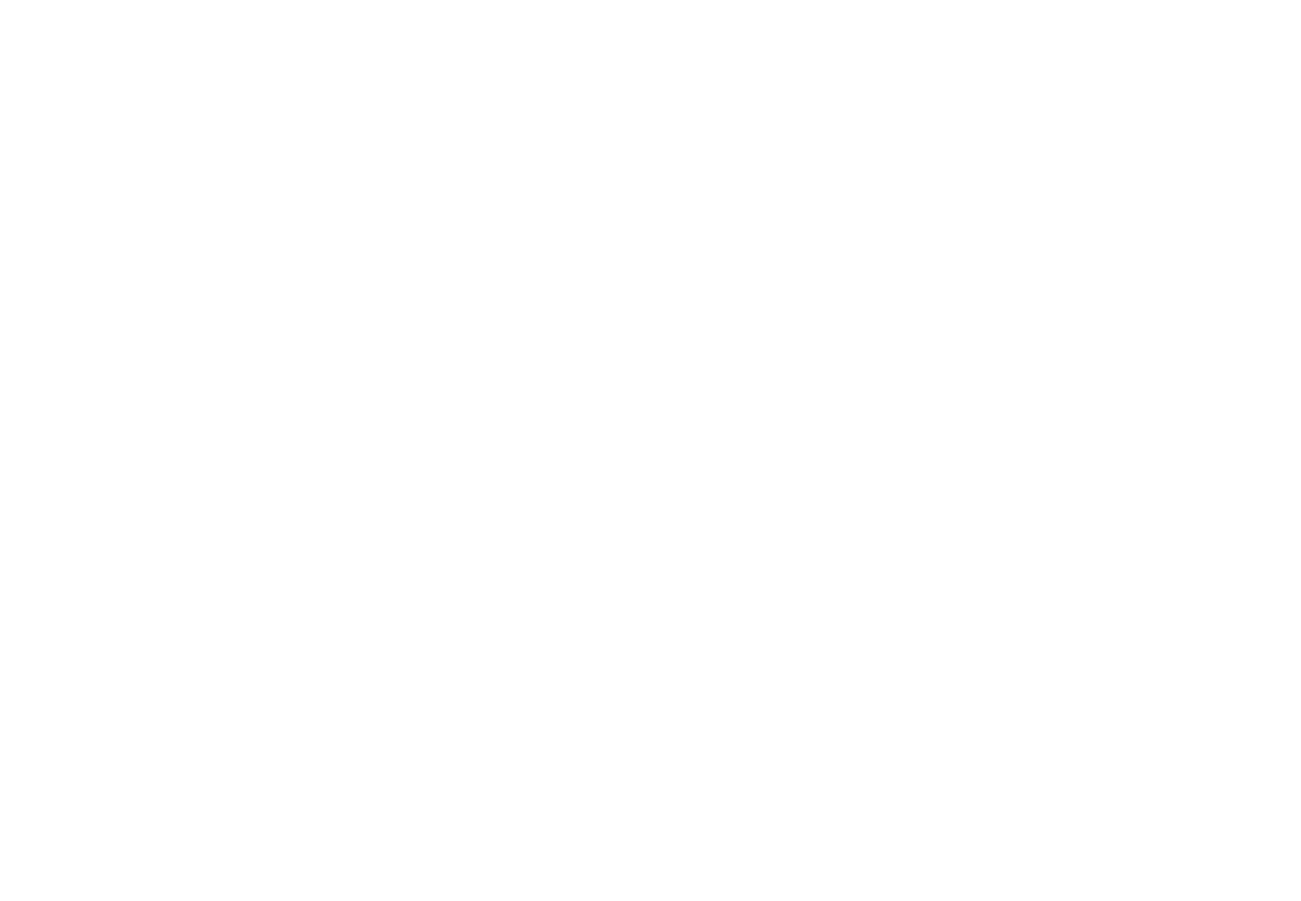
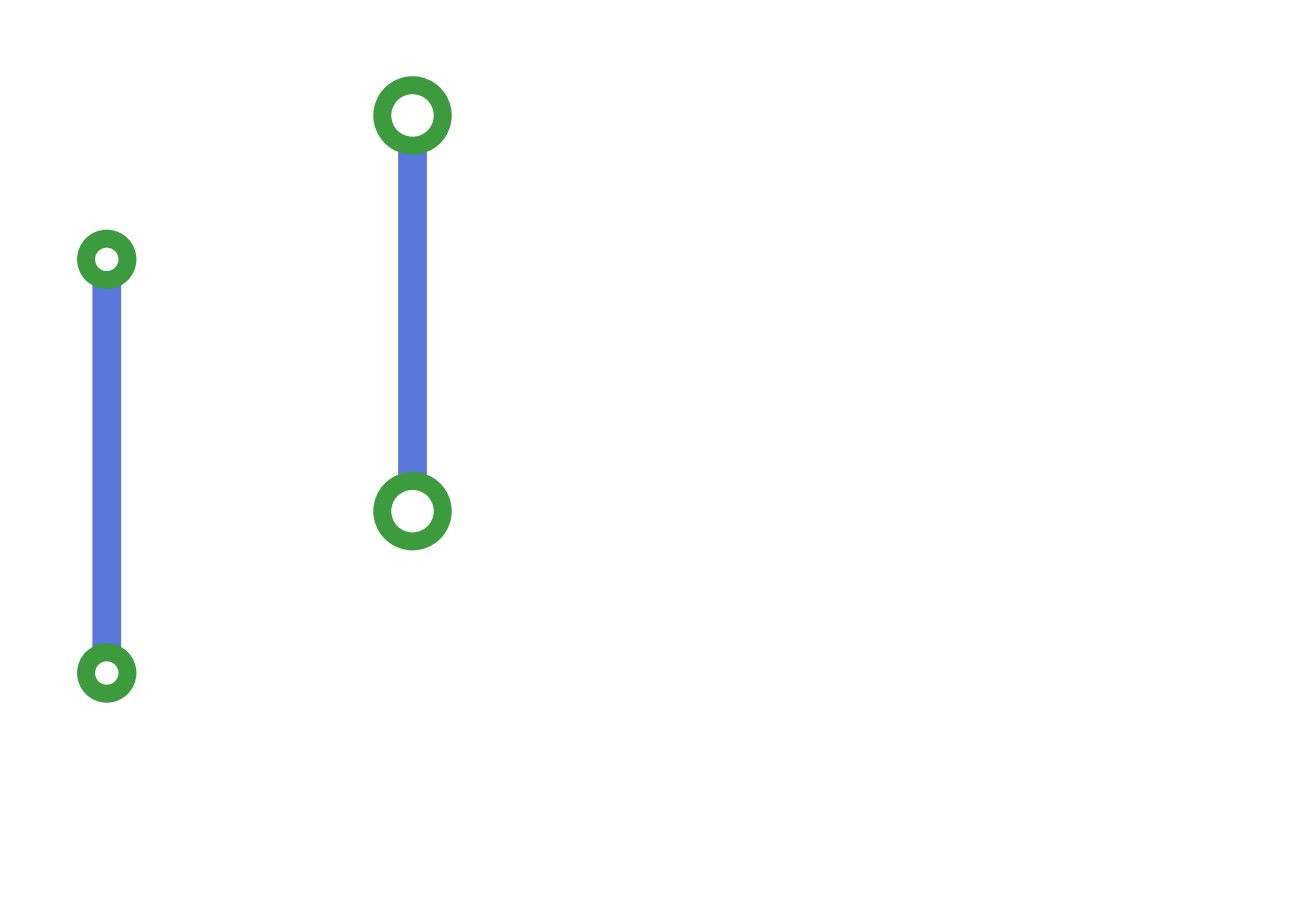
track: none -> (412, 115) (412, 511)
via: none -> (412, 115)
track: none -> (106, 259) (106, 673)
via: none -> (106, 259)
via: none -> (412, 511)
via: none -> (106, 673)

